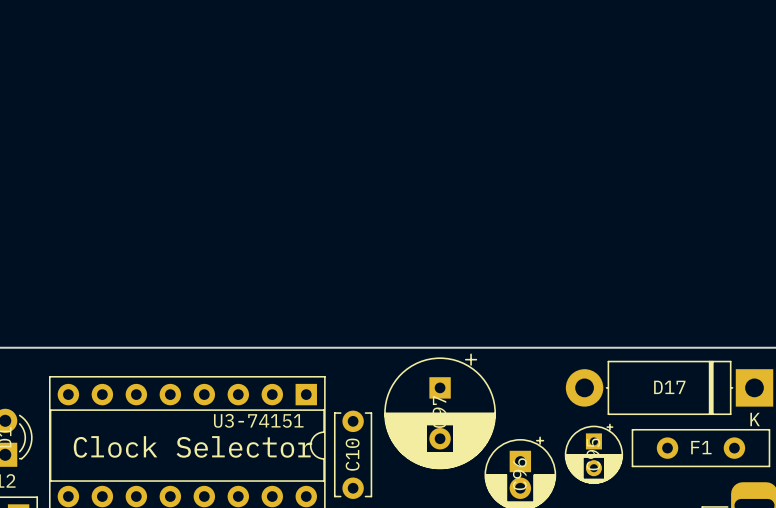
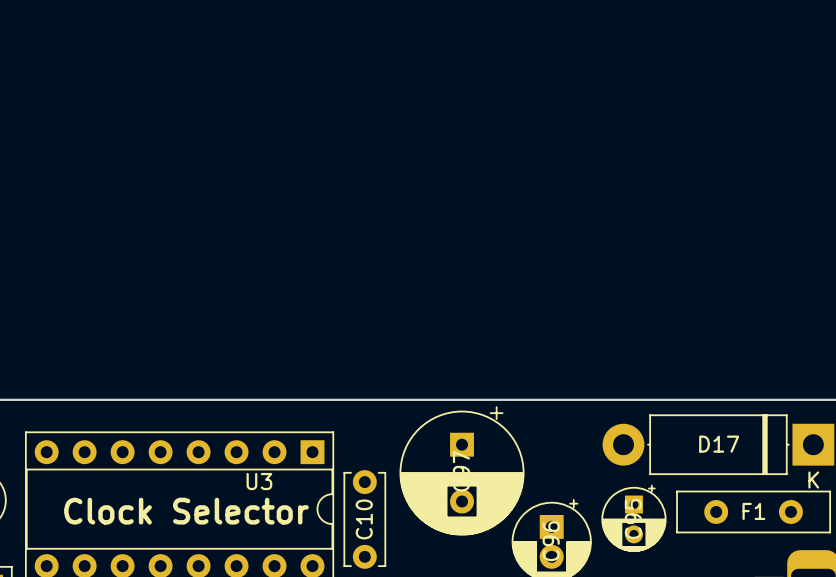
U3-74151 name: U3-74151 (258, 420) -> U3 (259, 481)

